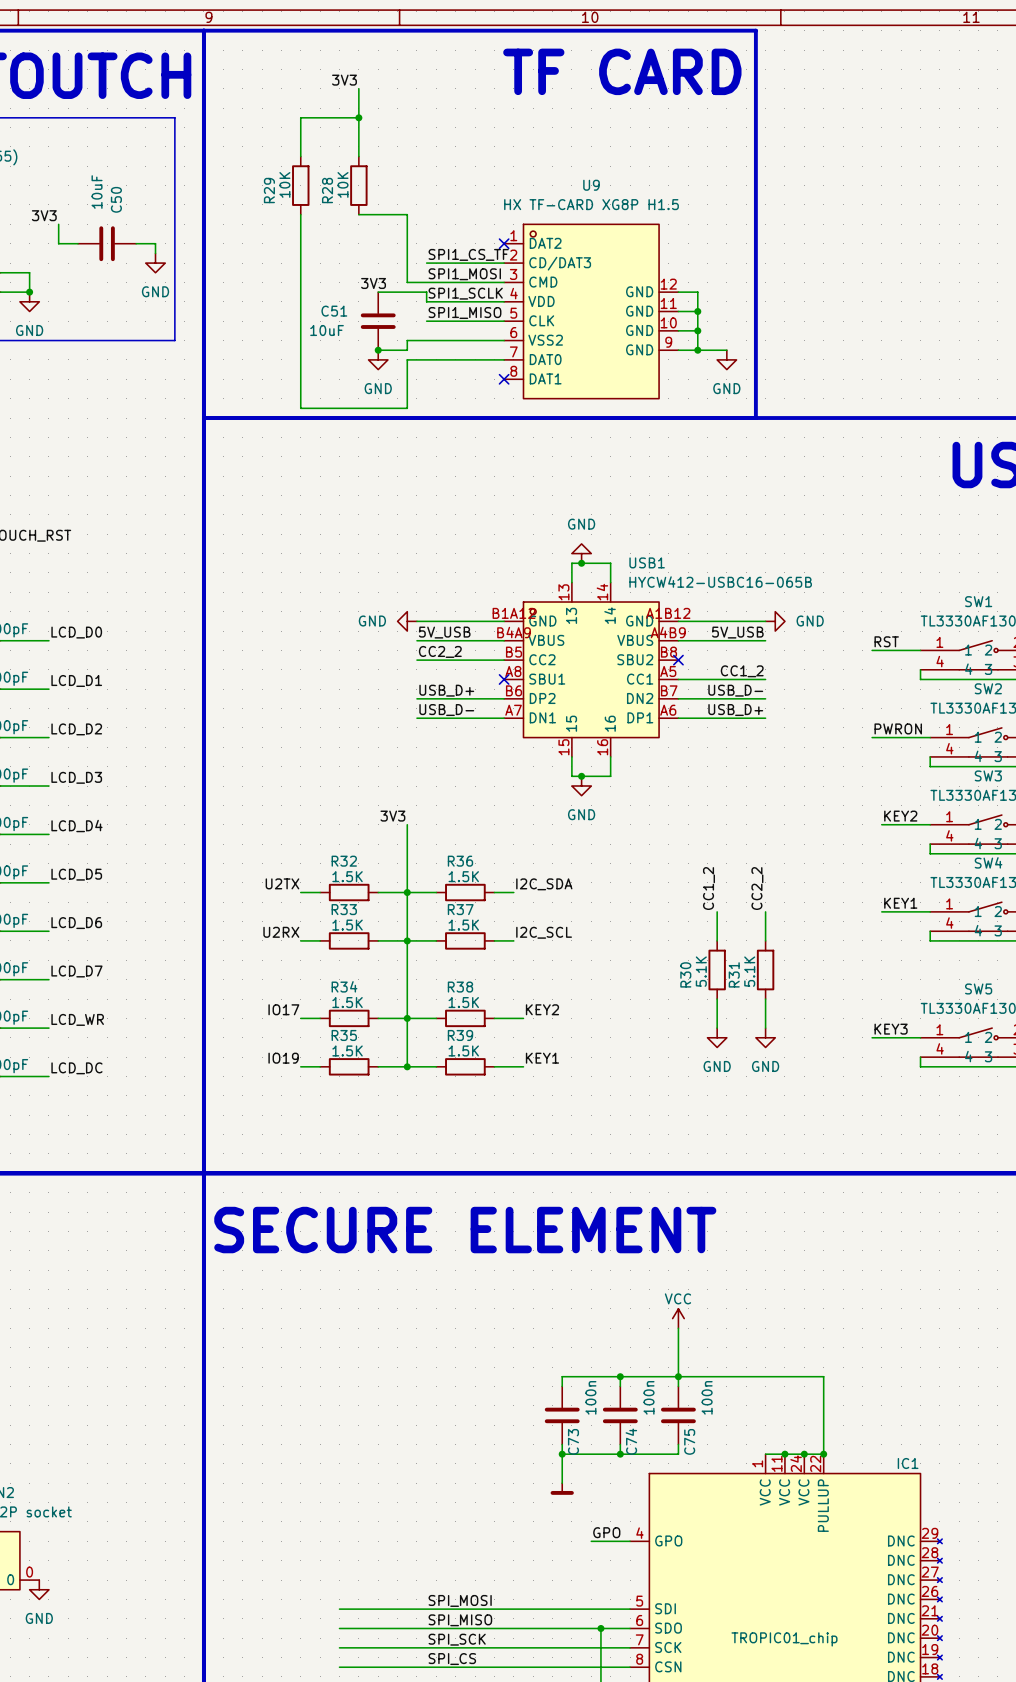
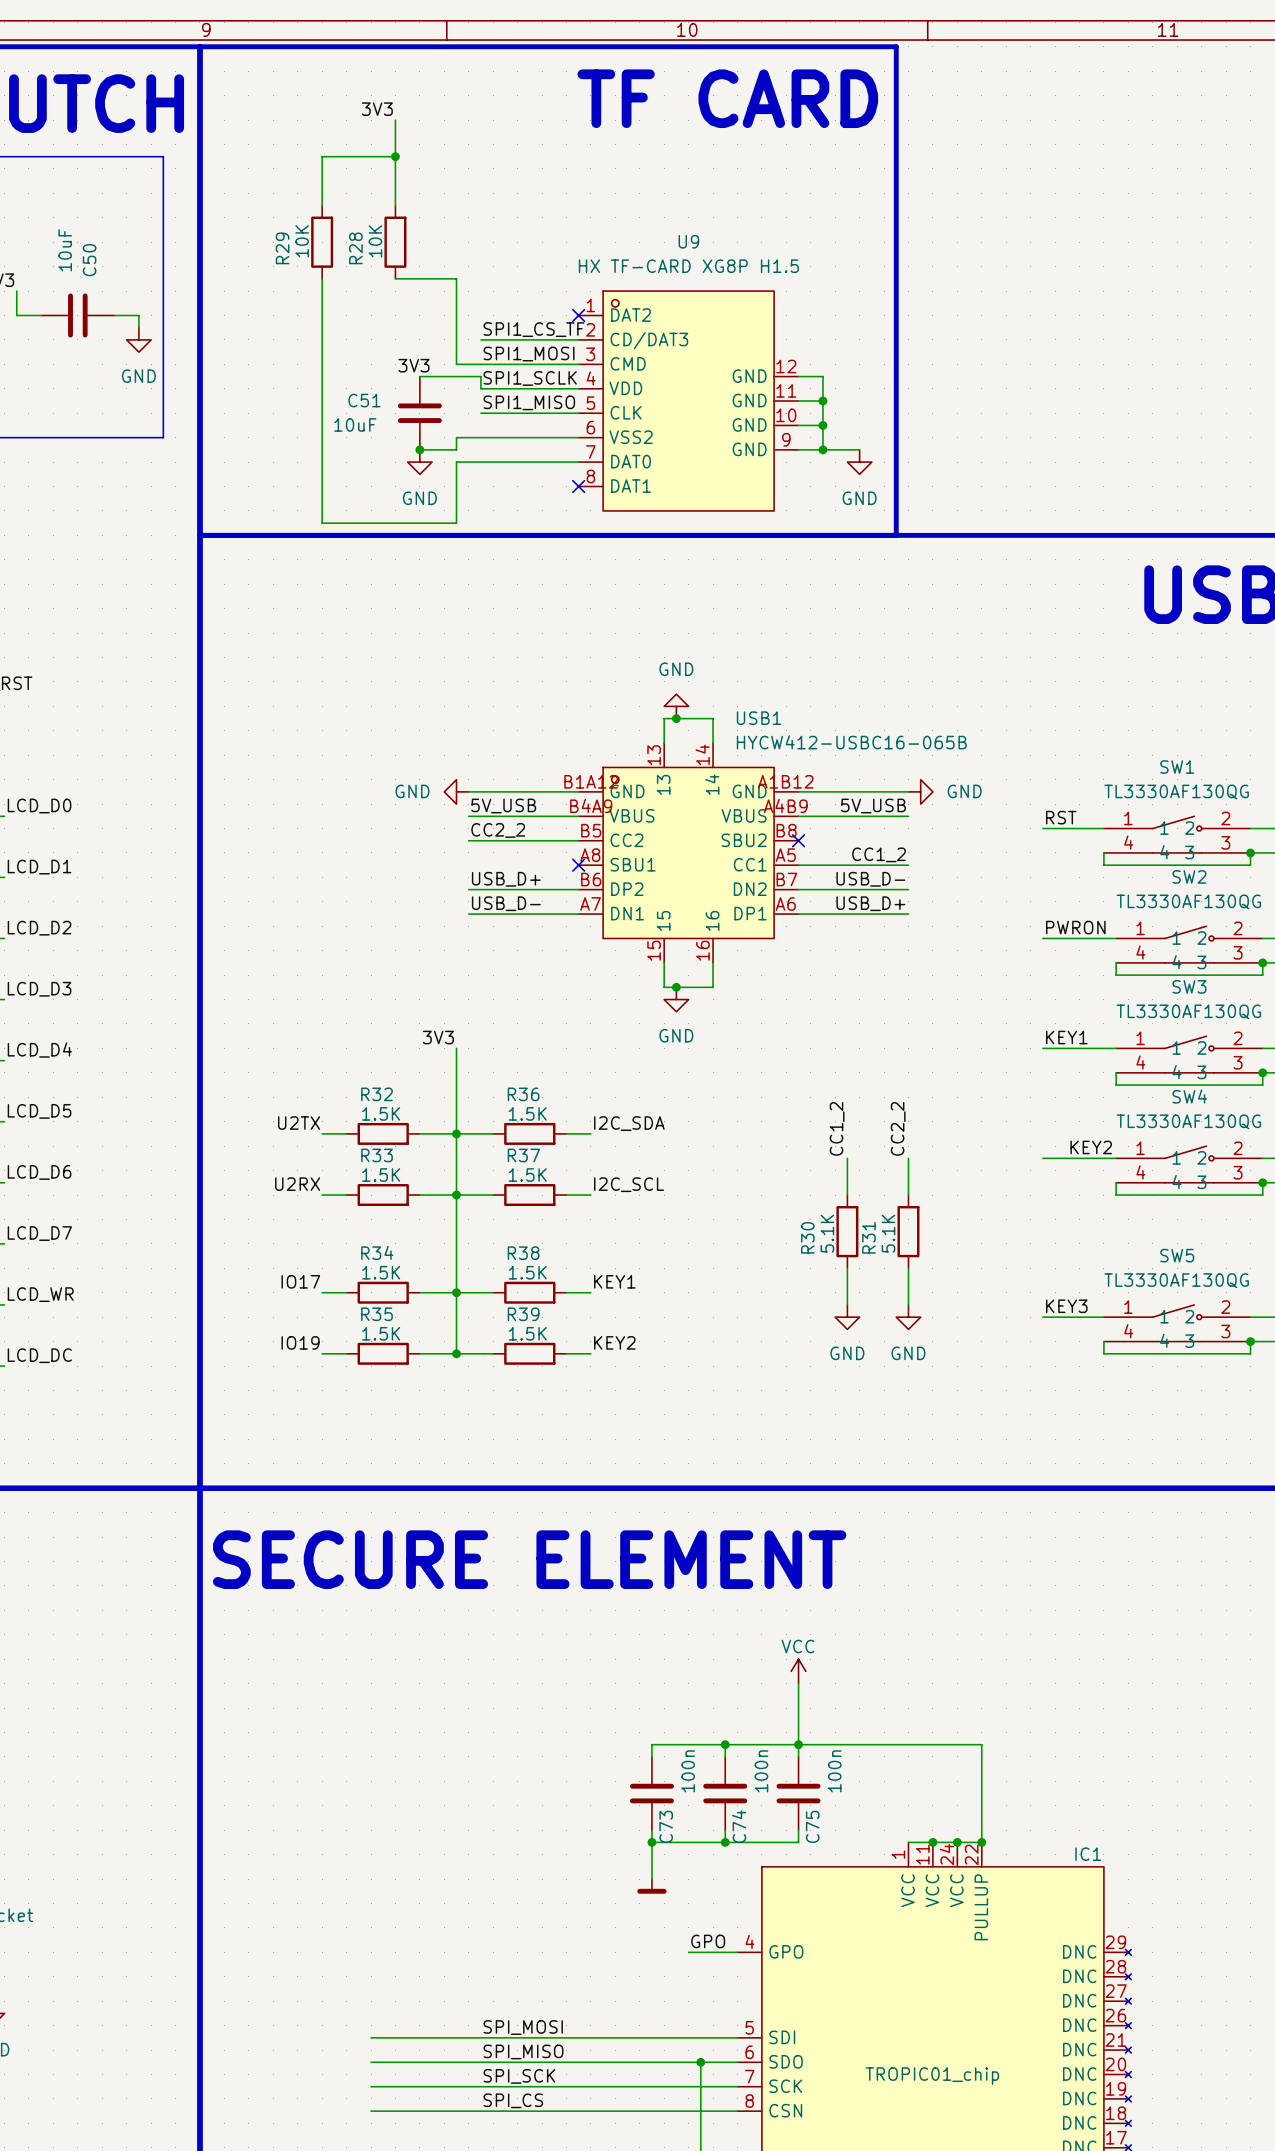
label position: KEY2 (900, 816) -> KEY2 (1091, 1147)
wire: none -> (1042, 1048) (1055, 1048)
label position: KEY1 (900, 903) -> KEY1 (1066, 1037)
wire: none -> (1042, 1158) (1055, 1158)
label position: KEY2 (542, 1009) -> KEY2 (614, 1342)
wire: (513, 1018) (523, 1018) -> none
label position: KEY1 (542, 1058) -> KEY1 (614, 1281)
wire: (513, 1066) (523, 1066) -> none

